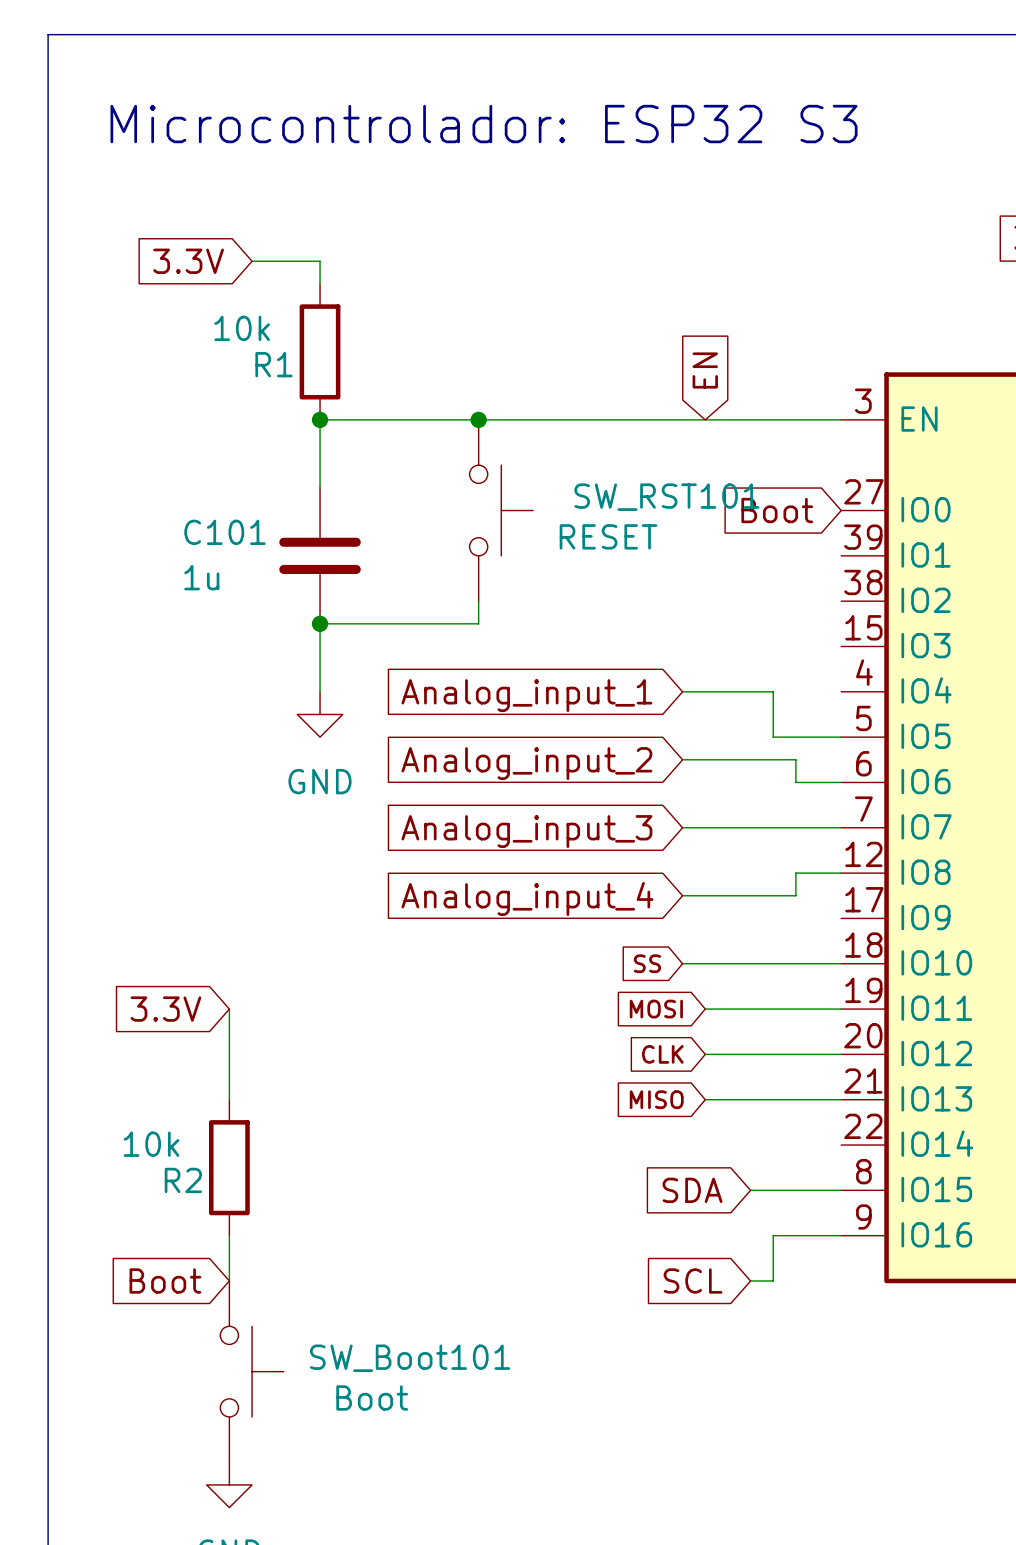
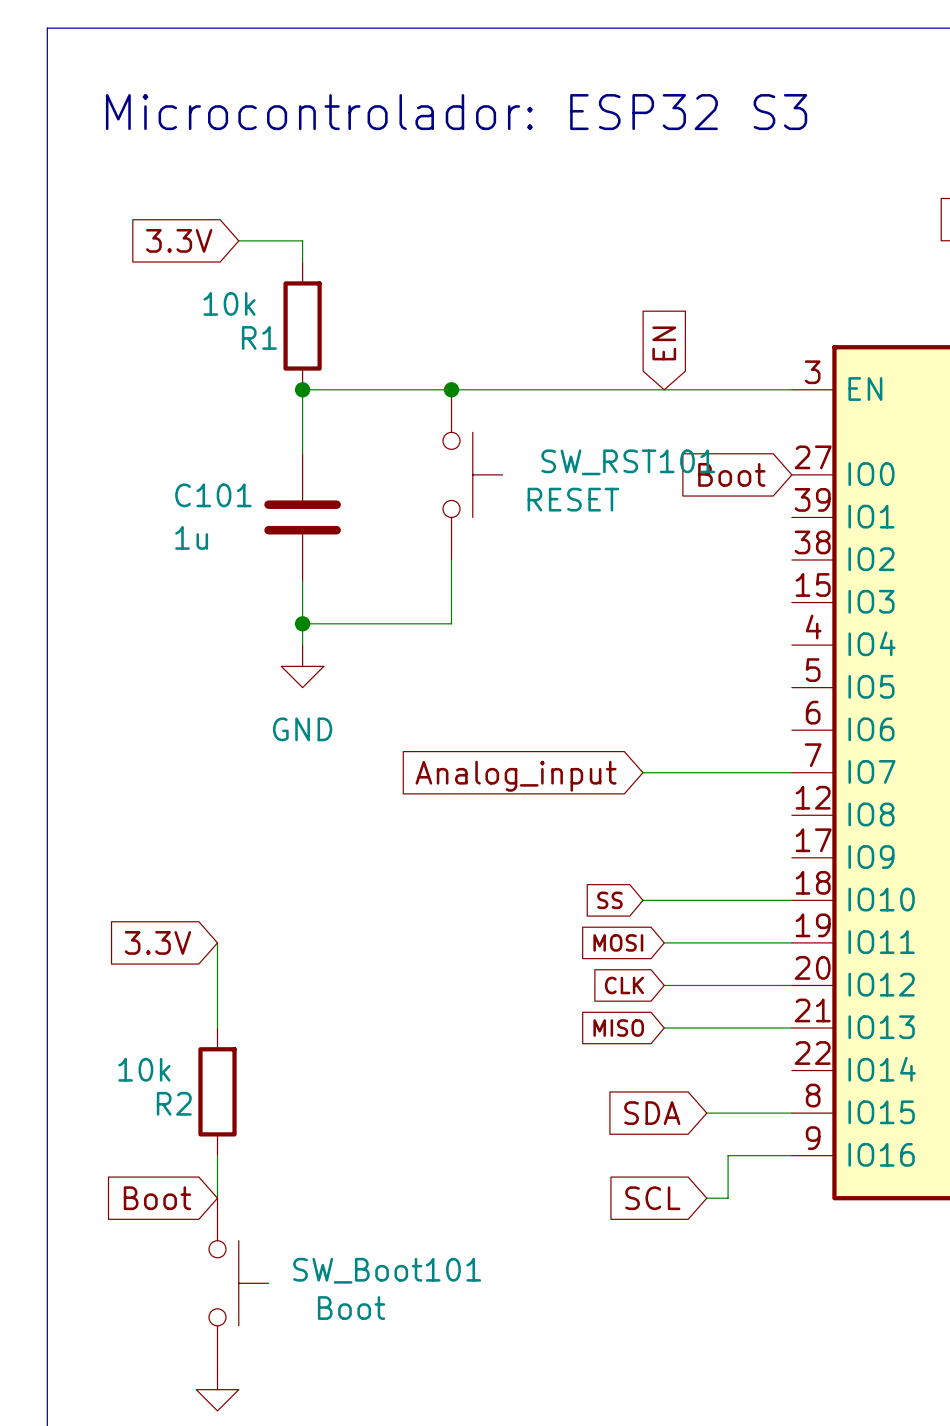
wire: (320, 623) (478, 623) -> (302, 623) (451, 623) (451, 581)
junction position: (320, 623) -> (302, 623)
wire: (682, 691) (773, 691) (773, 737) (841, 737) -> none
global label: Analog_input_1 (526, 695) -> none
wire: (682, 759) (795, 759) (795, 782) (841, 782) -> none
global label: Analog_input_2 (526, 763) -> none
global label: Analog_input_3 (526, 831) -> Analog_input (516, 776)
wire: (841, 873) (795, 873) (795, 895) (682, 895) -> none
global label: Analog_input_4 (527, 899) -> none

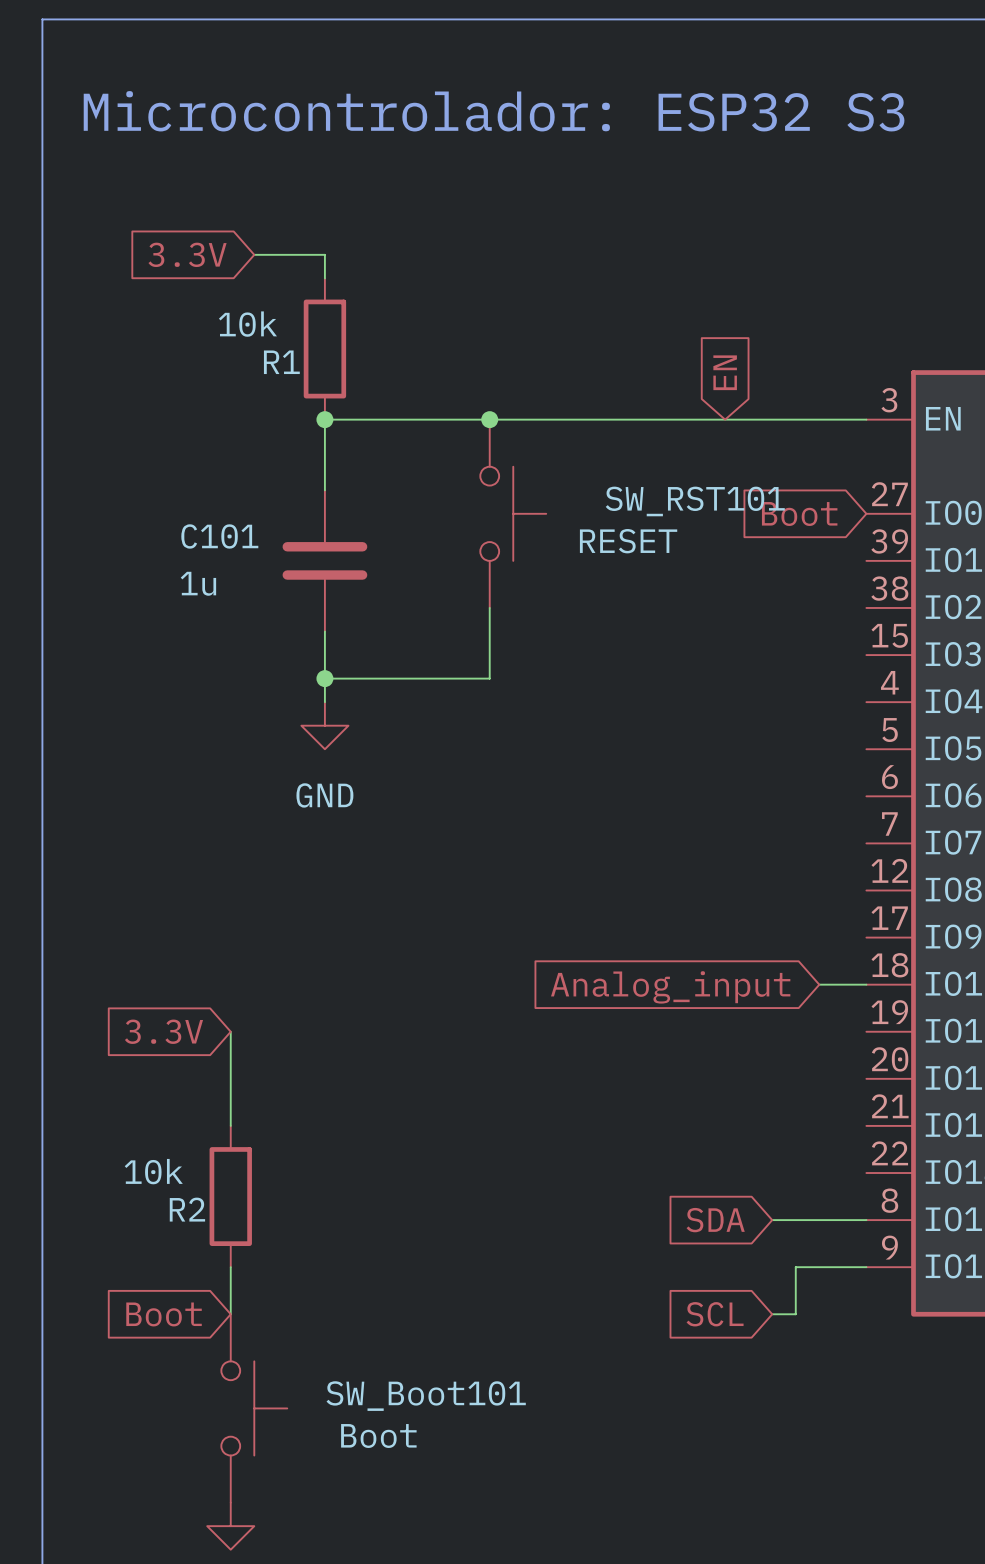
wire: (642, 772) (791, 772) -> none
global label position: Analog_input (516, 776) -> Analog_input (670, 987)
global label: SS (609, 900) -> none
wire: (642, 900) (749, 900) -> none
global label: MOSI (618, 942) -> none
wire: (664, 942) (791, 942) -> none
global label: CLK (624, 985) -> none
wire: (664, 985) (791, 985) -> none
global label: MISO (618, 1028) -> none
wire: (664, 1028) (791, 1028) -> none

